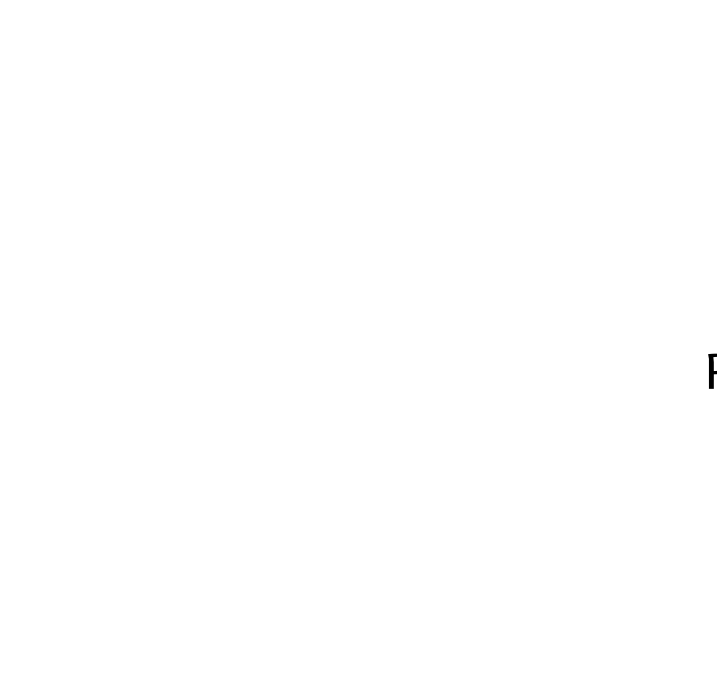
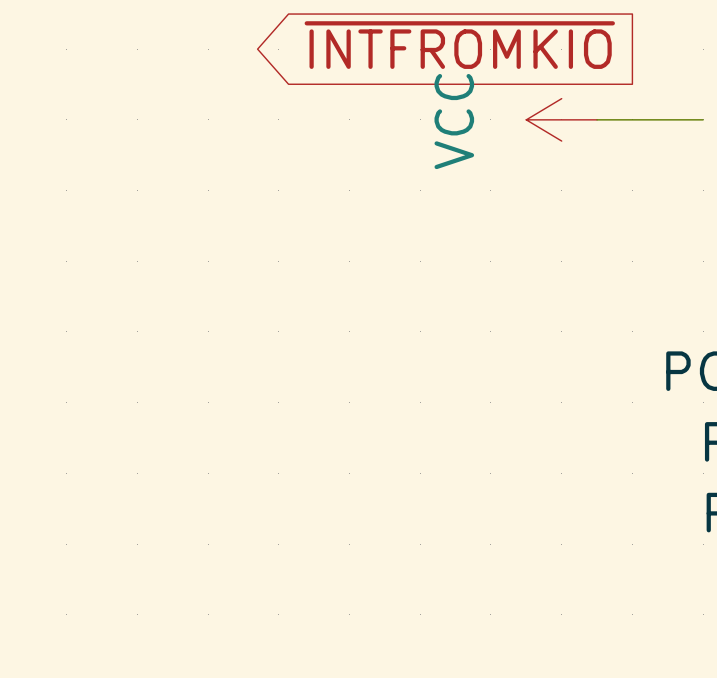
global label: none -> ~{INTFROMKIO} (459, 45)
power symbol: none -> VCC (561, 119)
wire: none -> (597, 119) (703, 119)

